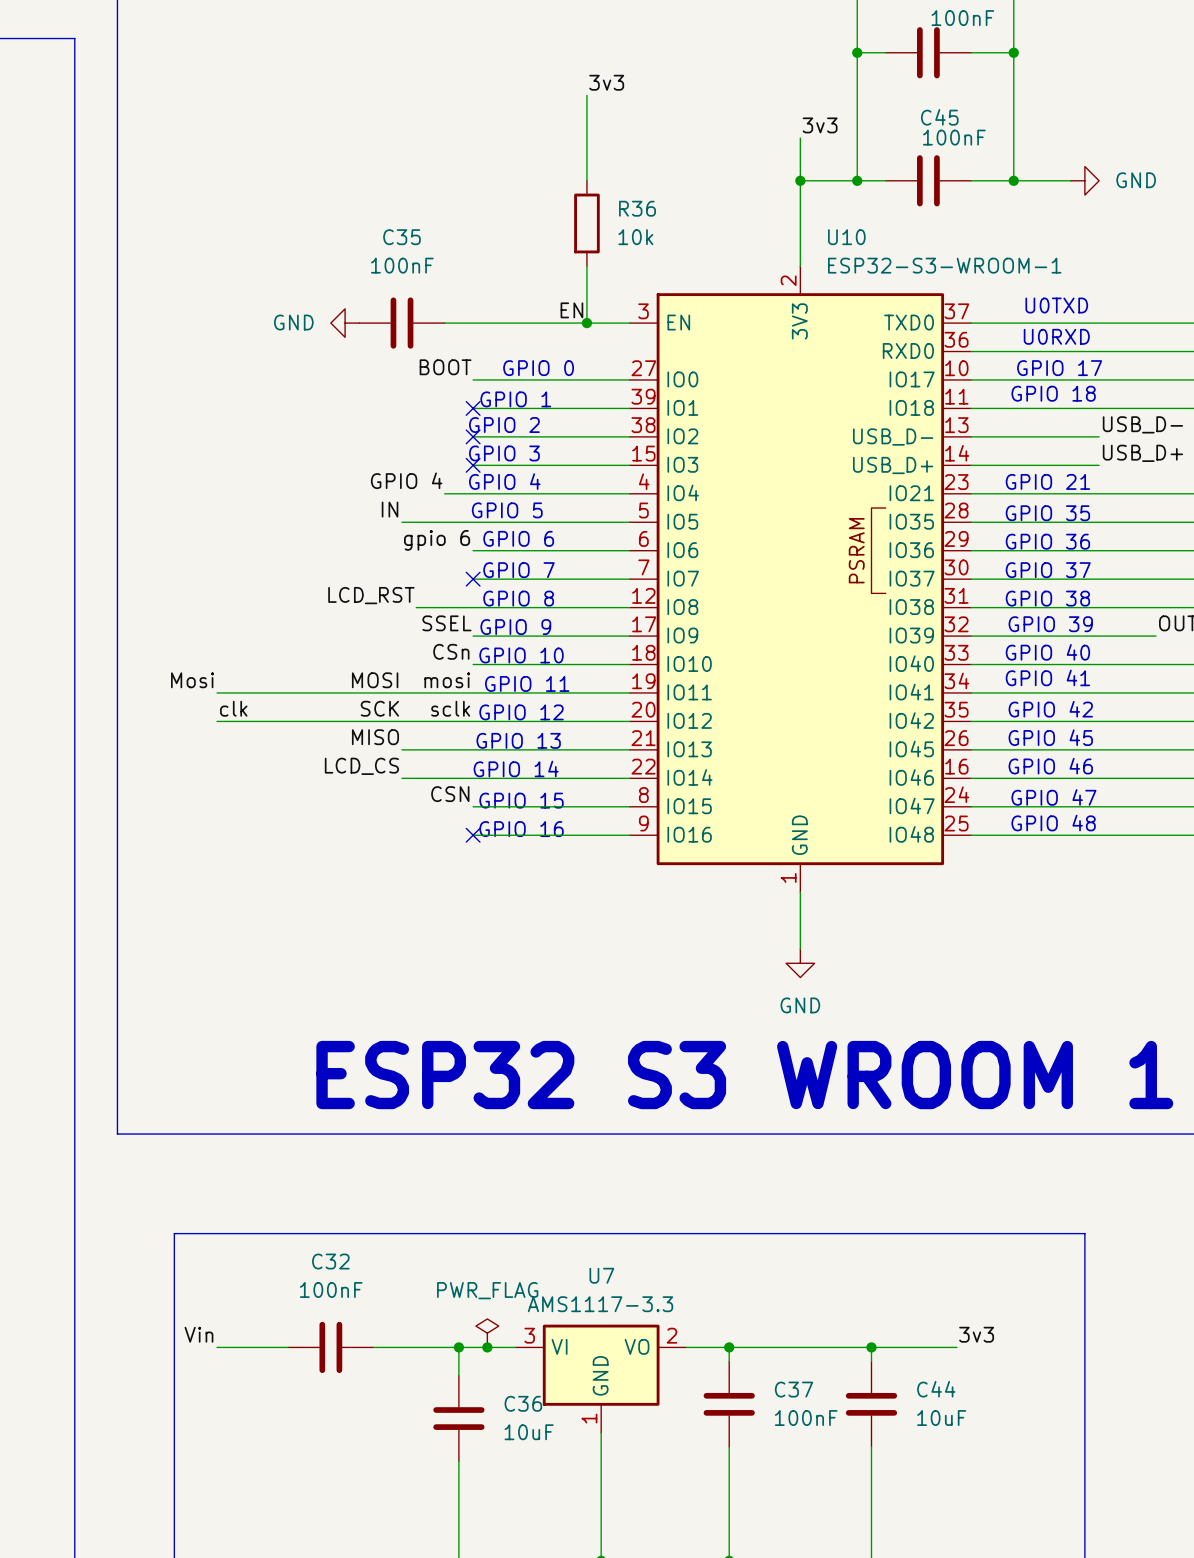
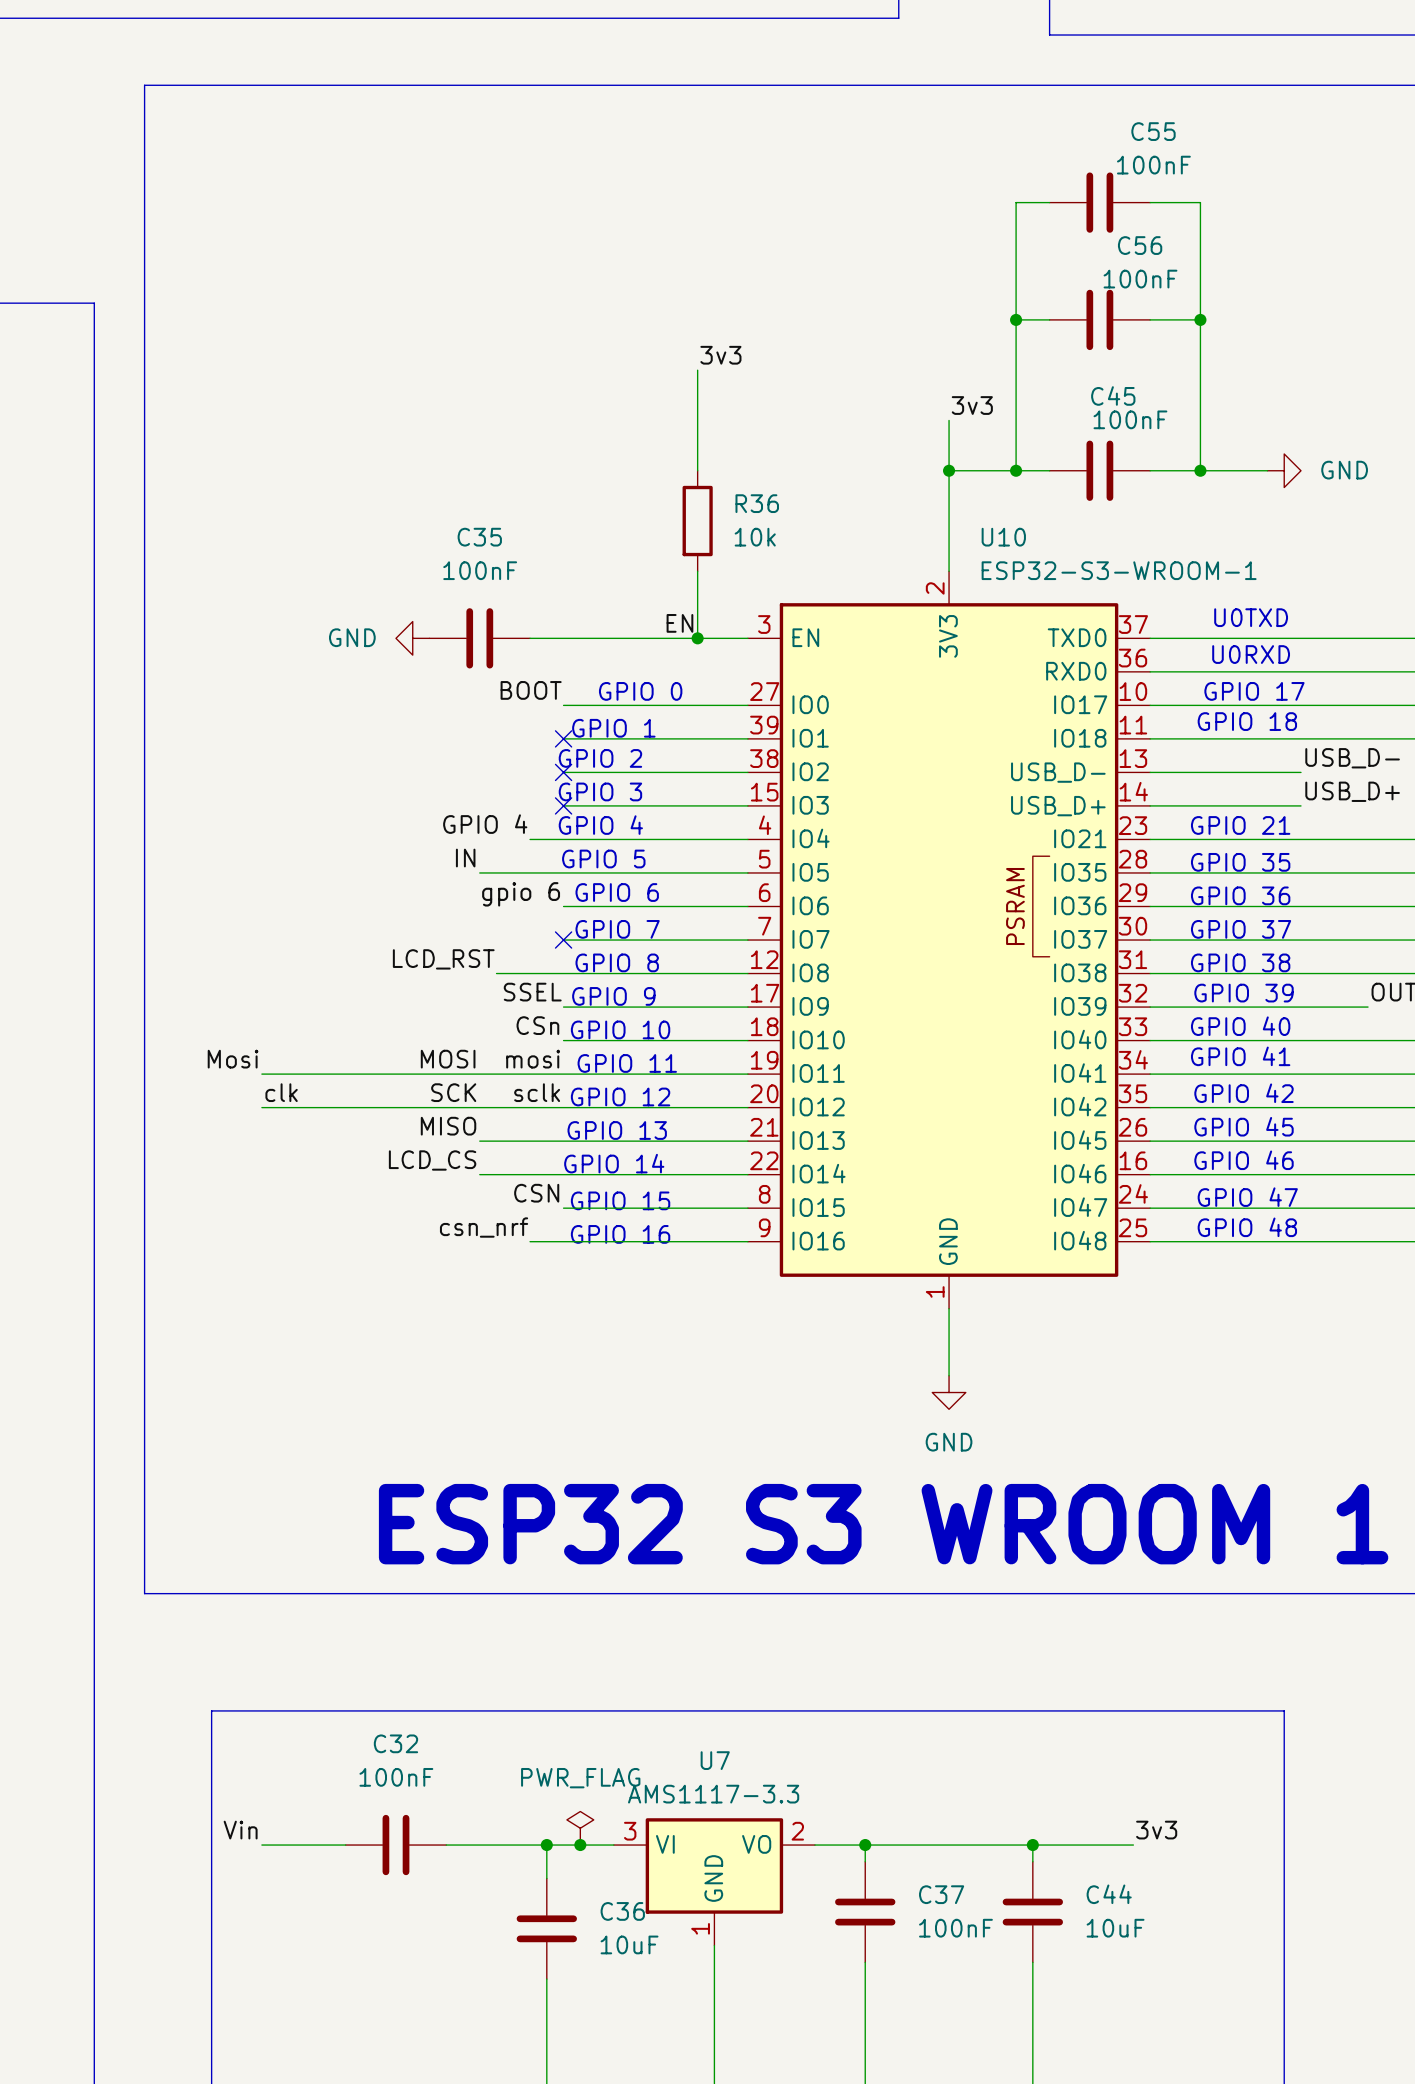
label: none -> csn_nrf (484, 1227)
wire: none -> (530, 1241) (563, 1241)
no-connect mark: (473, 835) -> none

